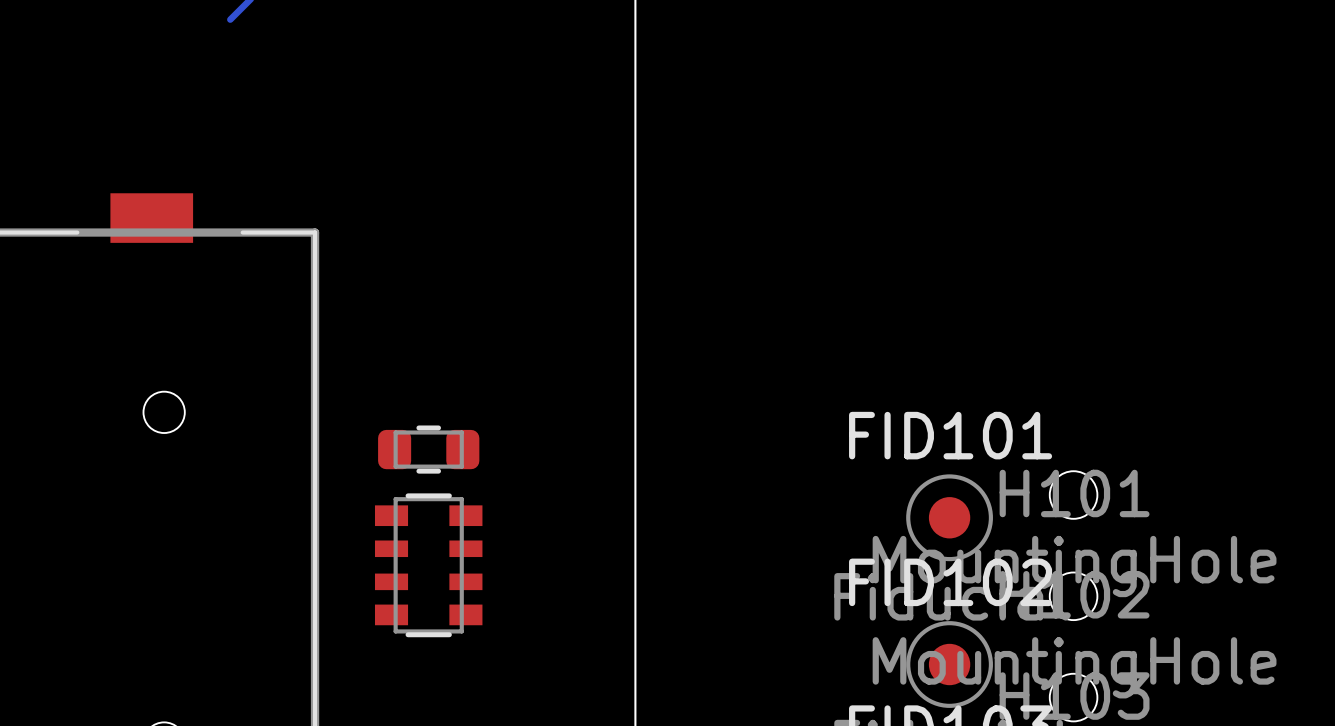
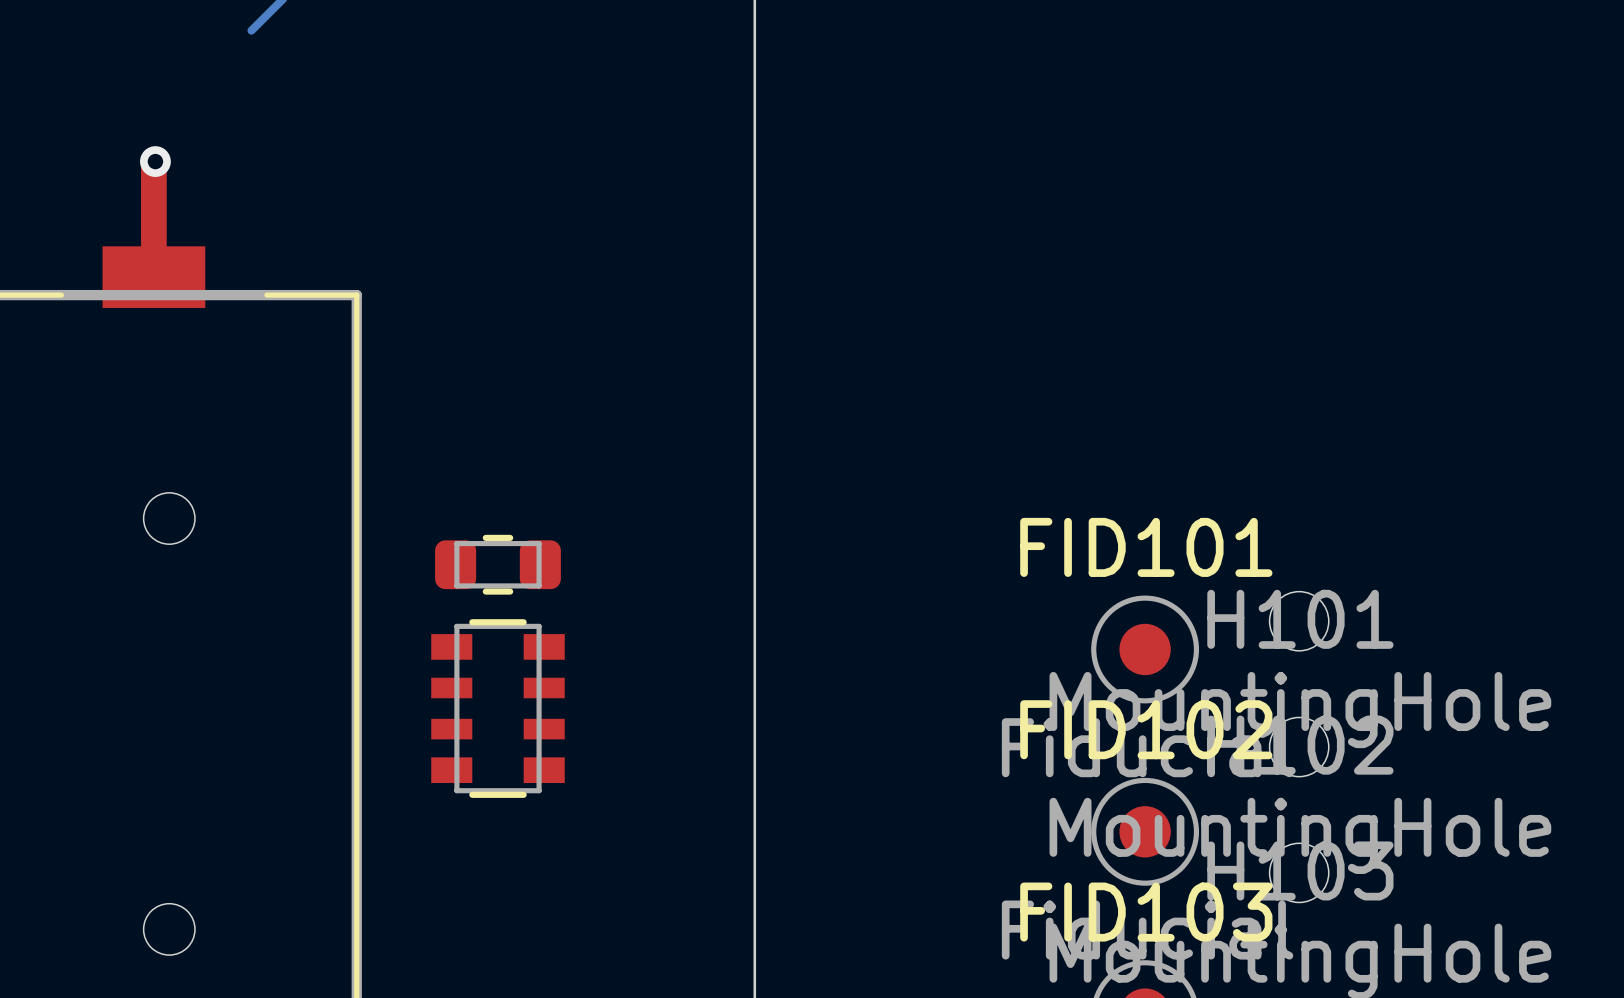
top track: none -> (155, 161) (153, 163) (153, 277)
via: none -> (155, 161)

